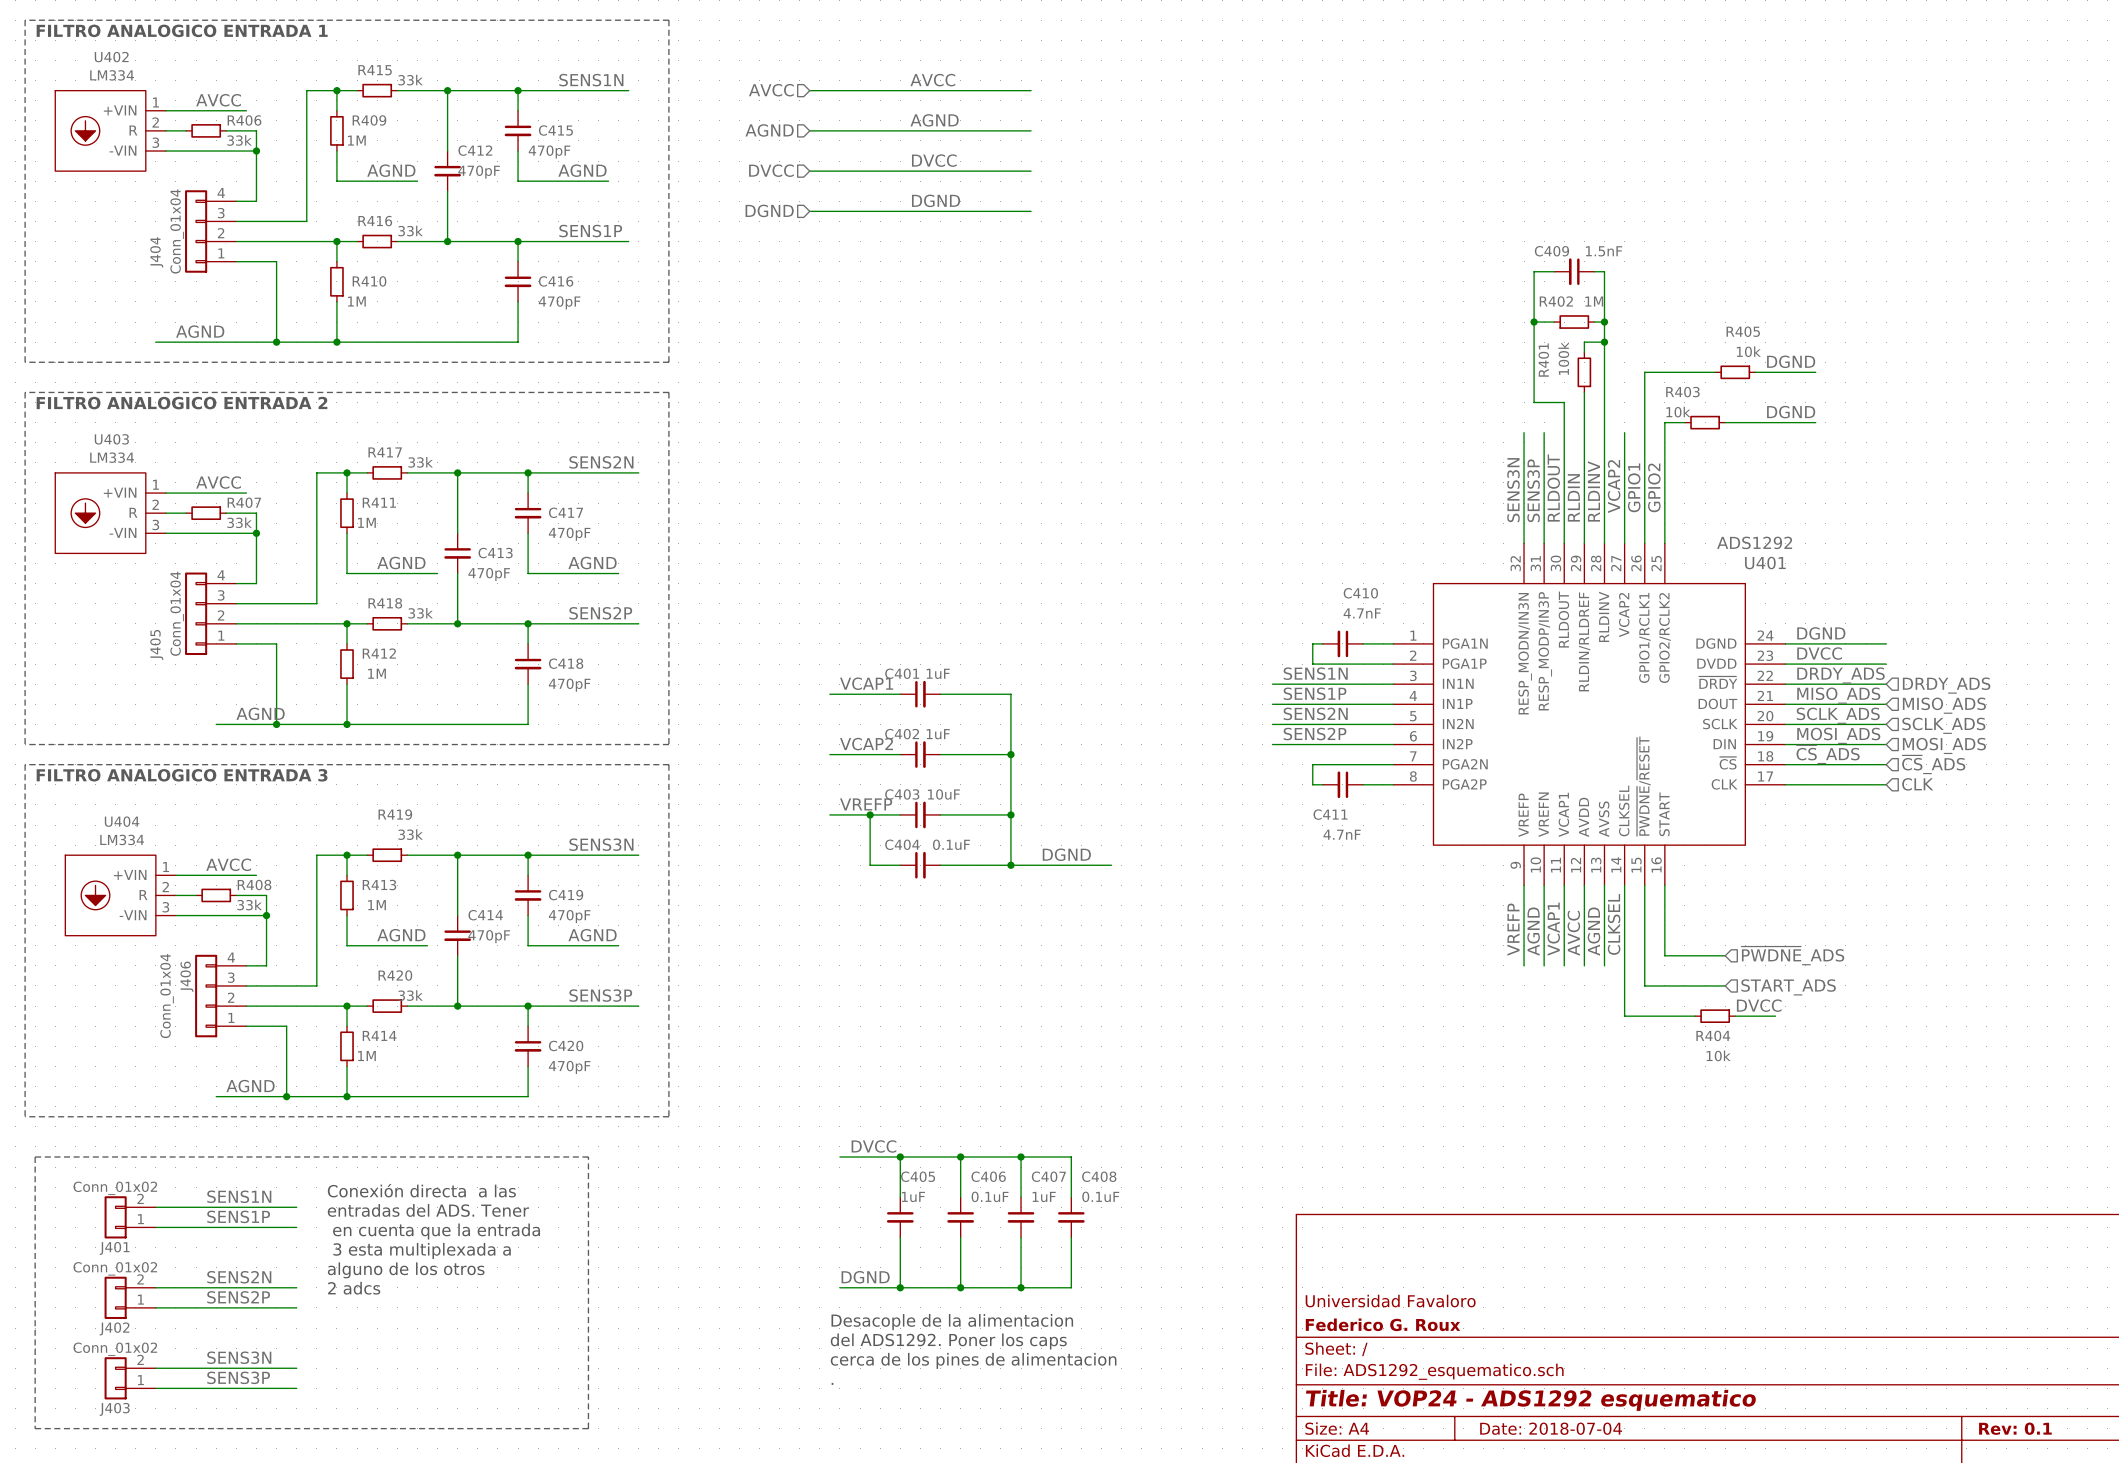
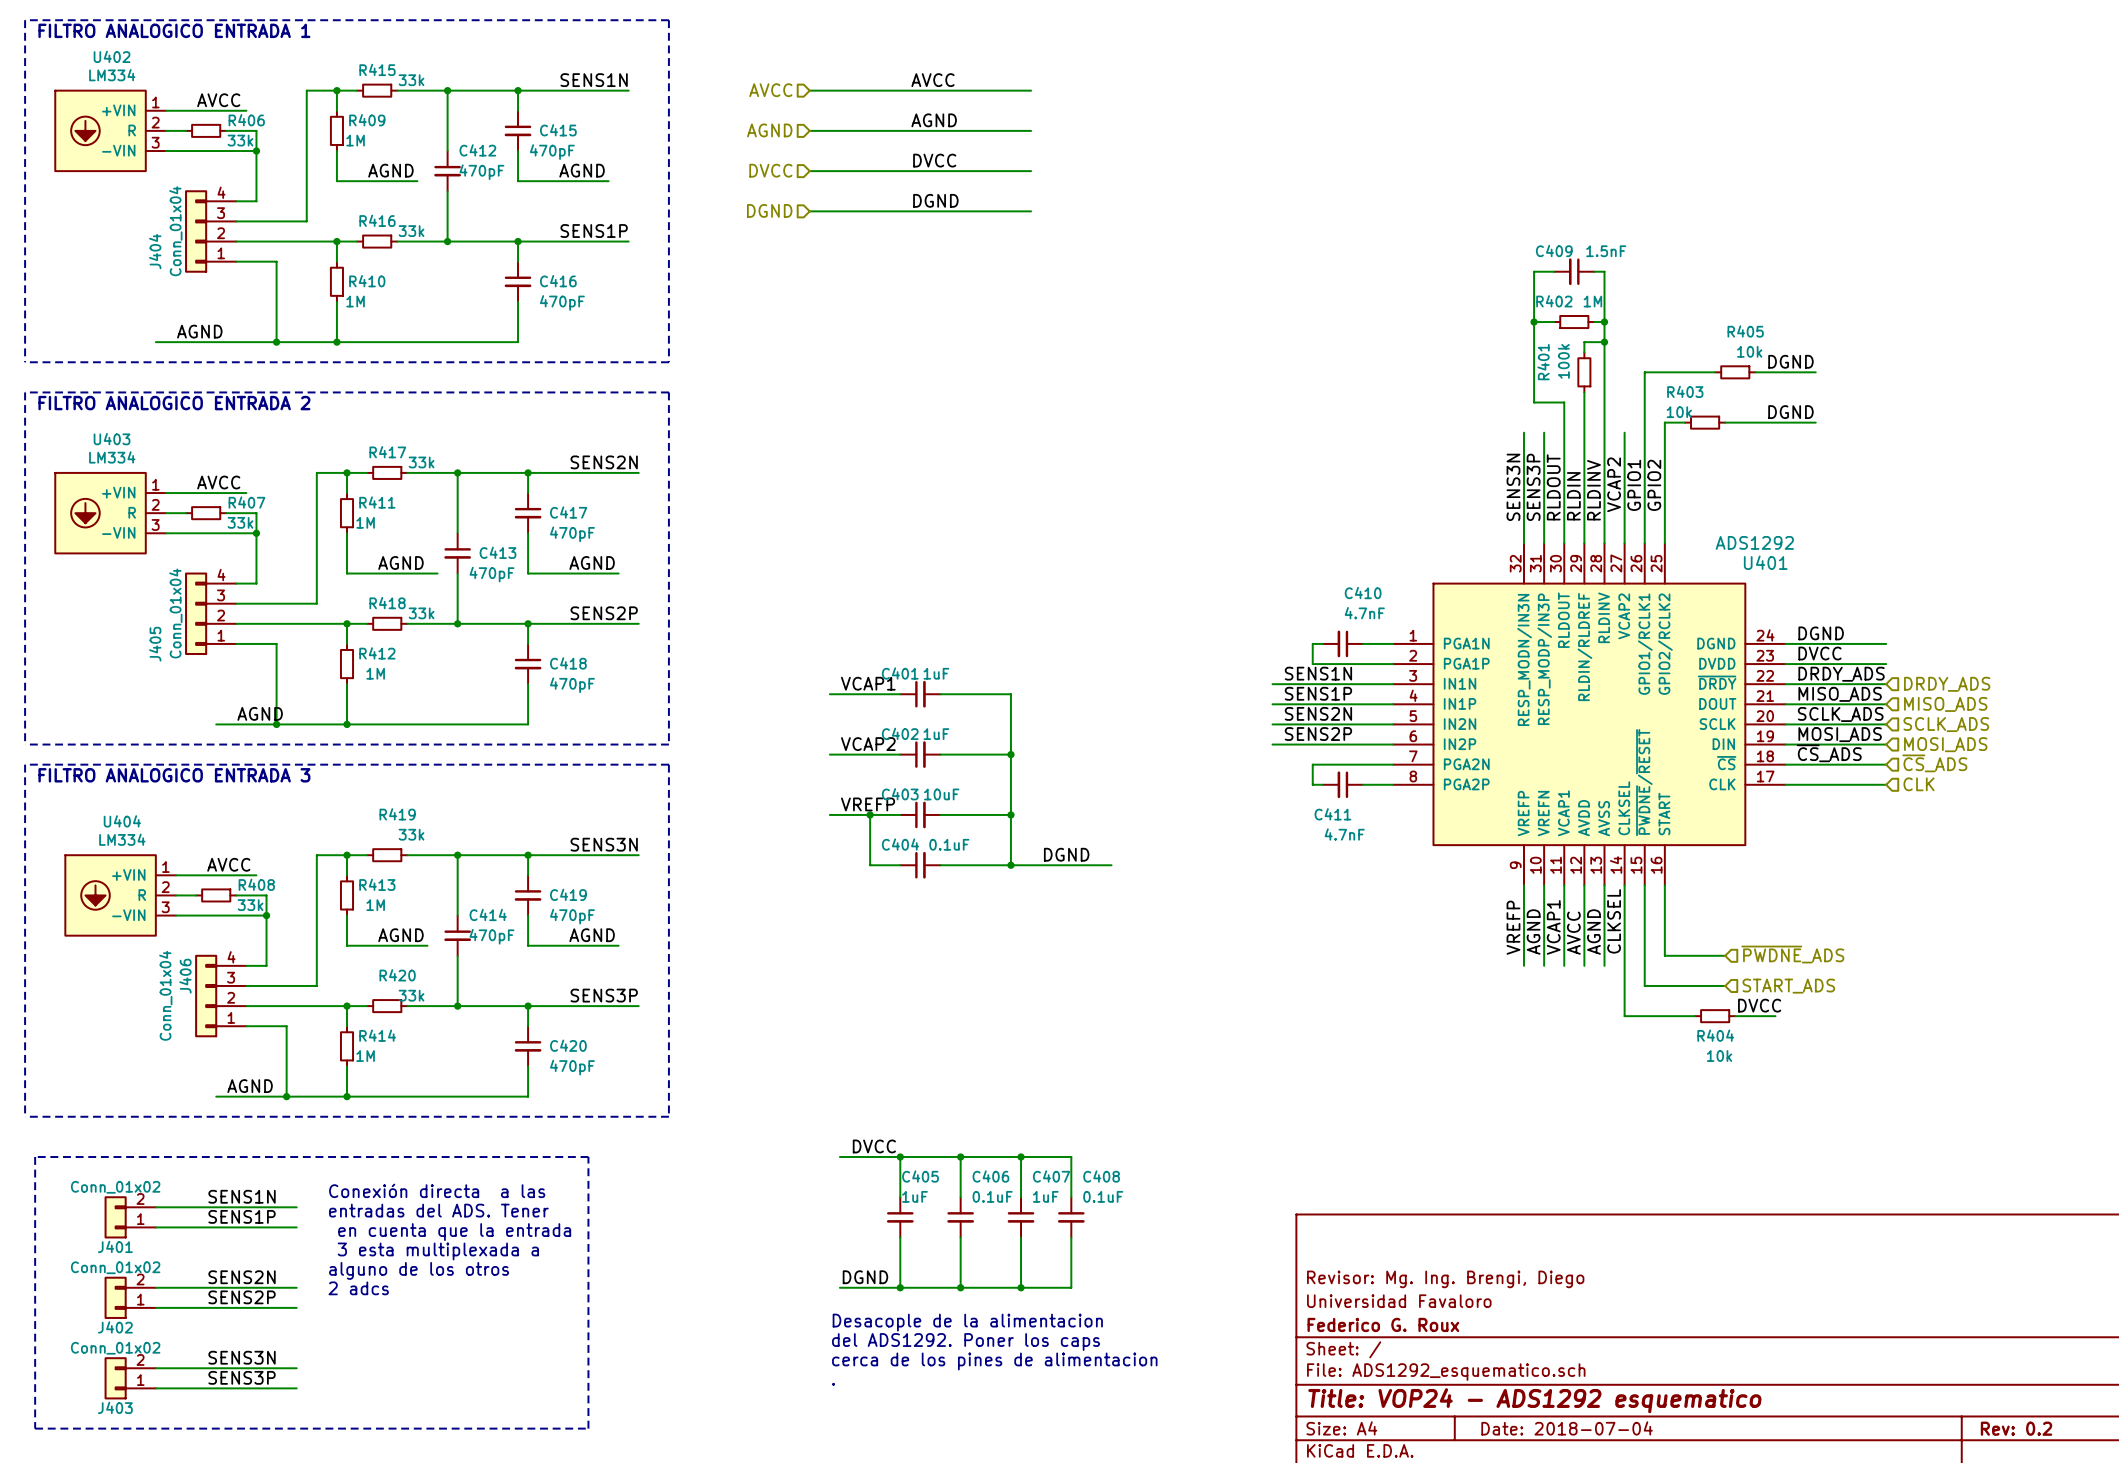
title block: none -> Revisor: Mg. Ing. Brengi, Diego (1445, 1279)
title block: Rev: 0.1 (2015, 1428) -> Rev: 0.2 (2016, 1428)

